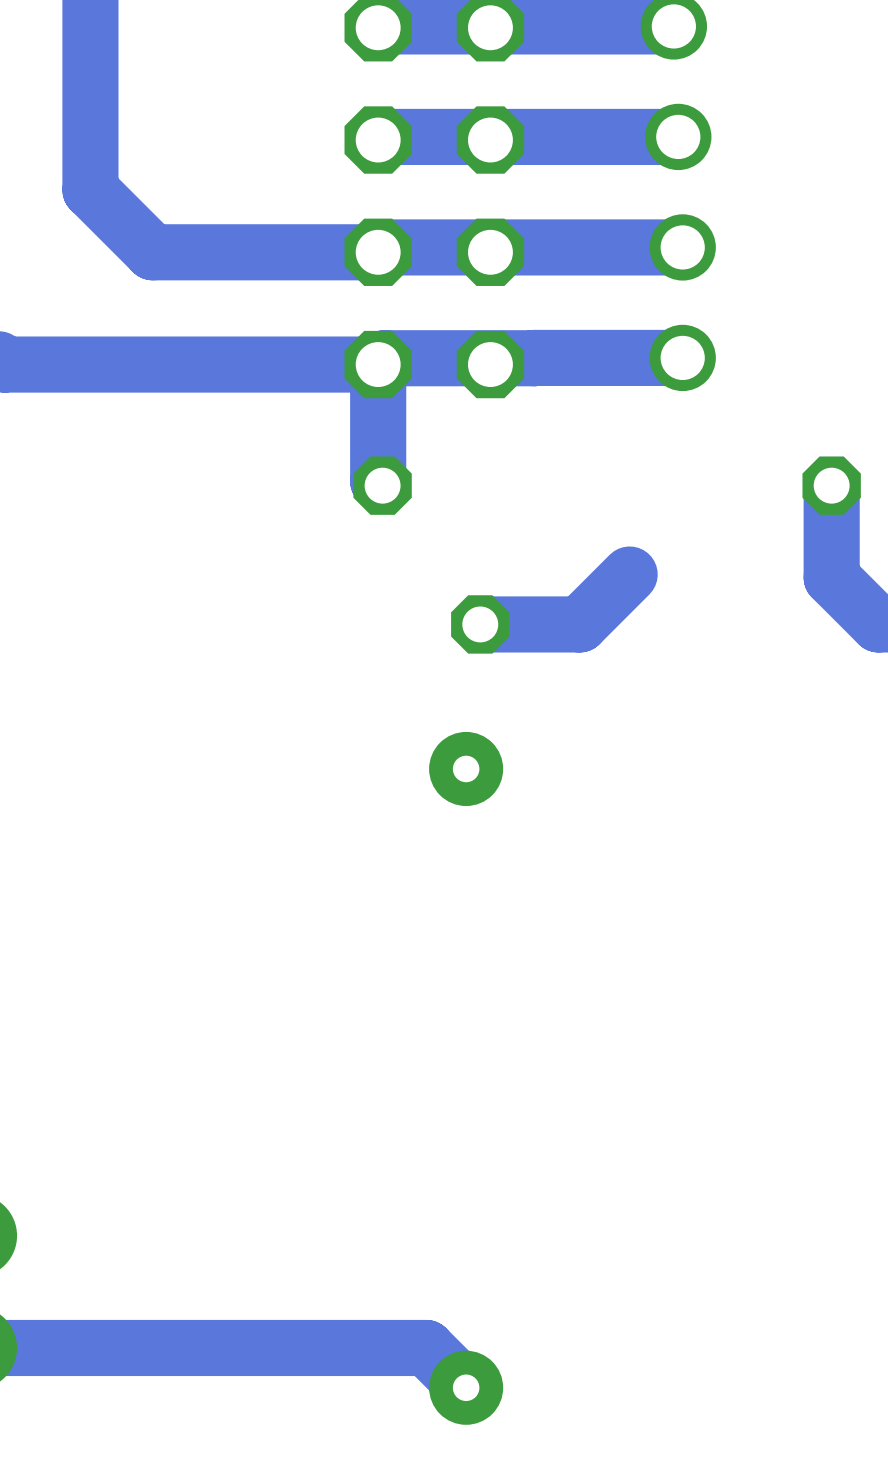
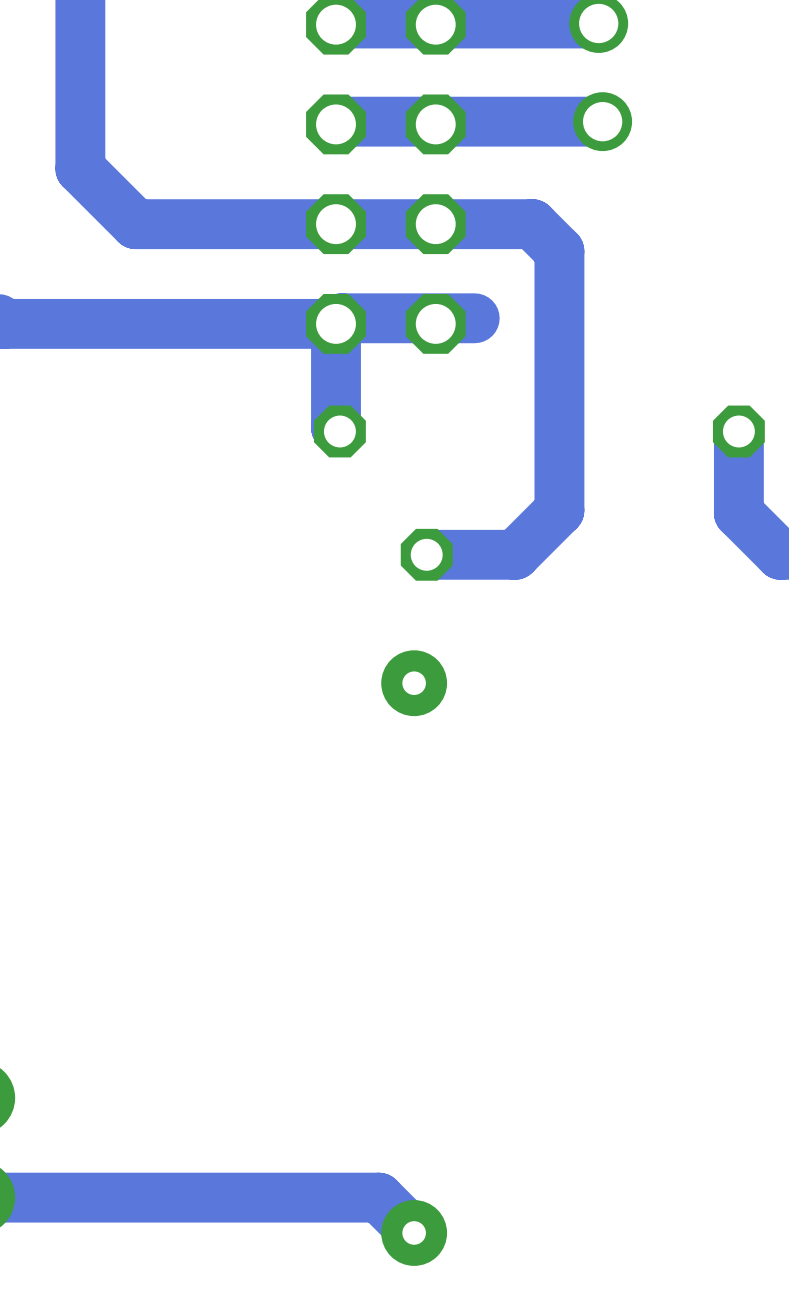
track: (682, 247) (383, 247) (378, 252) -> (559, 510) (559, 251) (532, 224) (336, 224)
via: (682, 247) -> none
track: (682, 357) (534, 357) -> none
via: (682, 357) -> none

